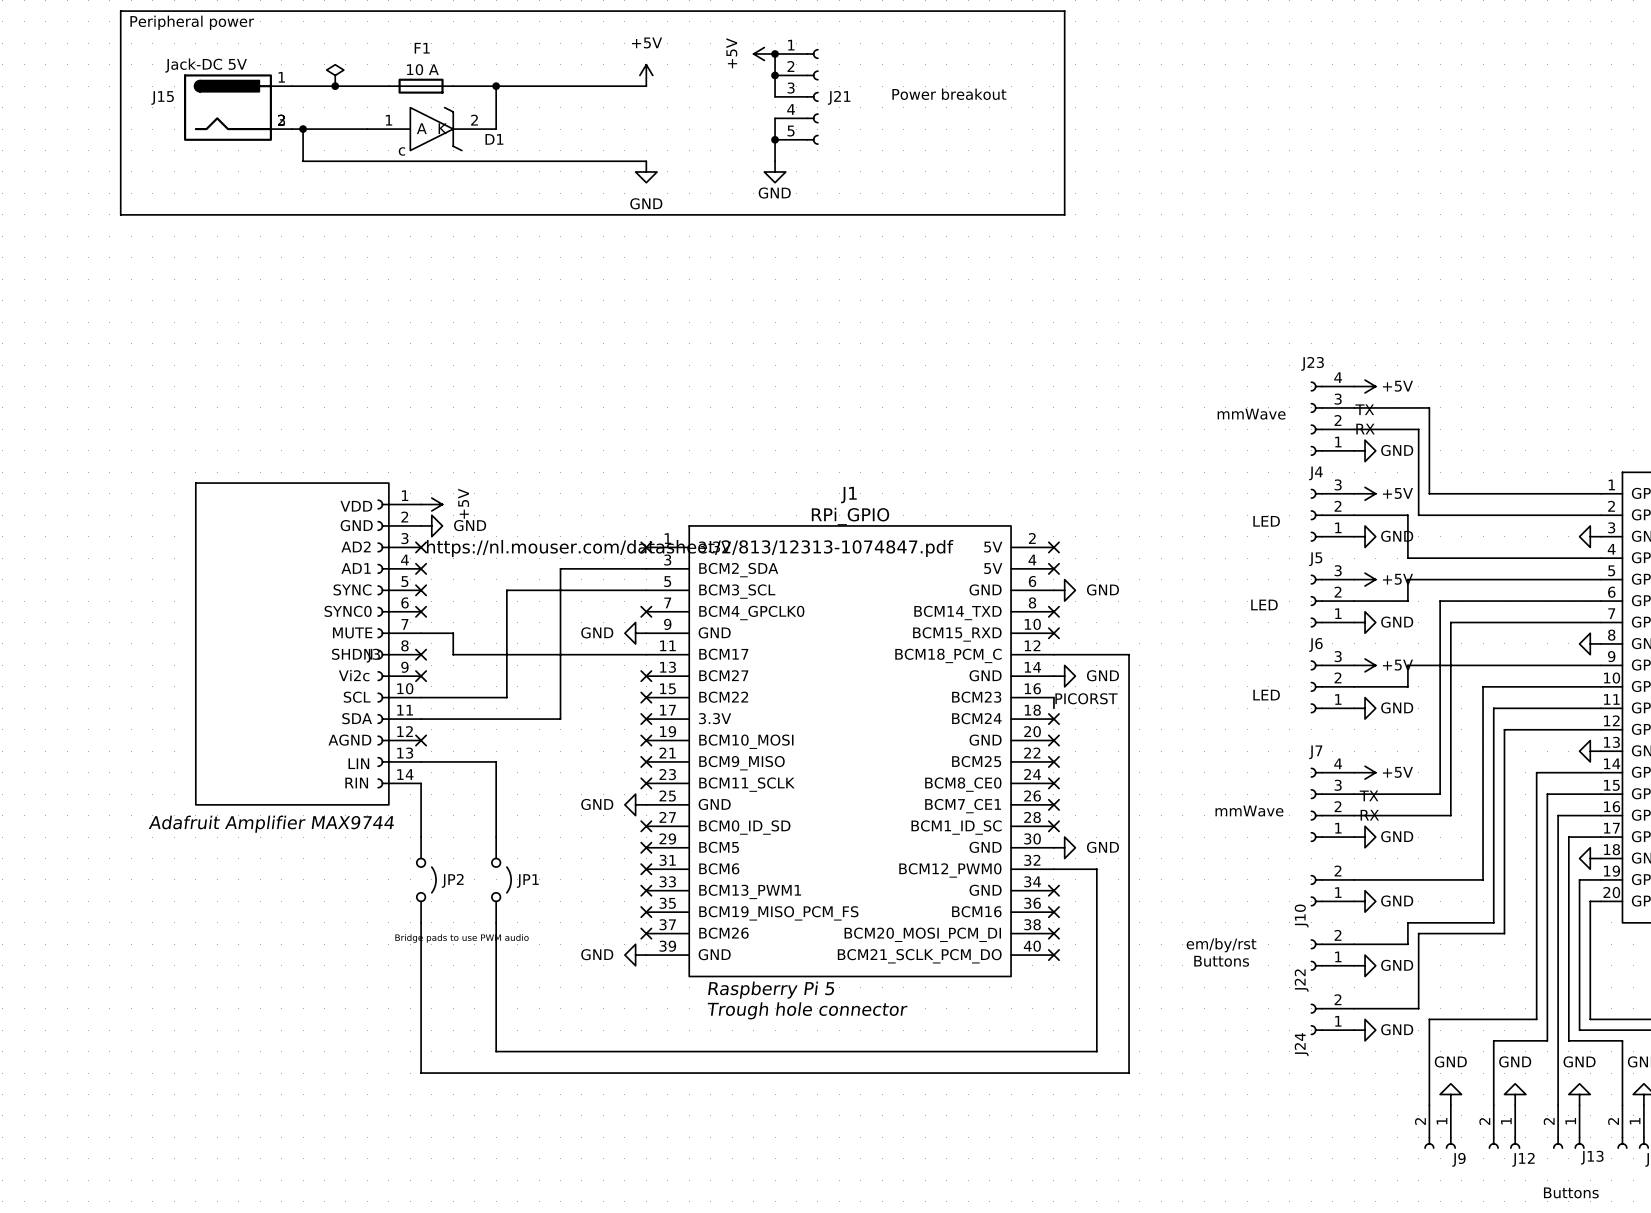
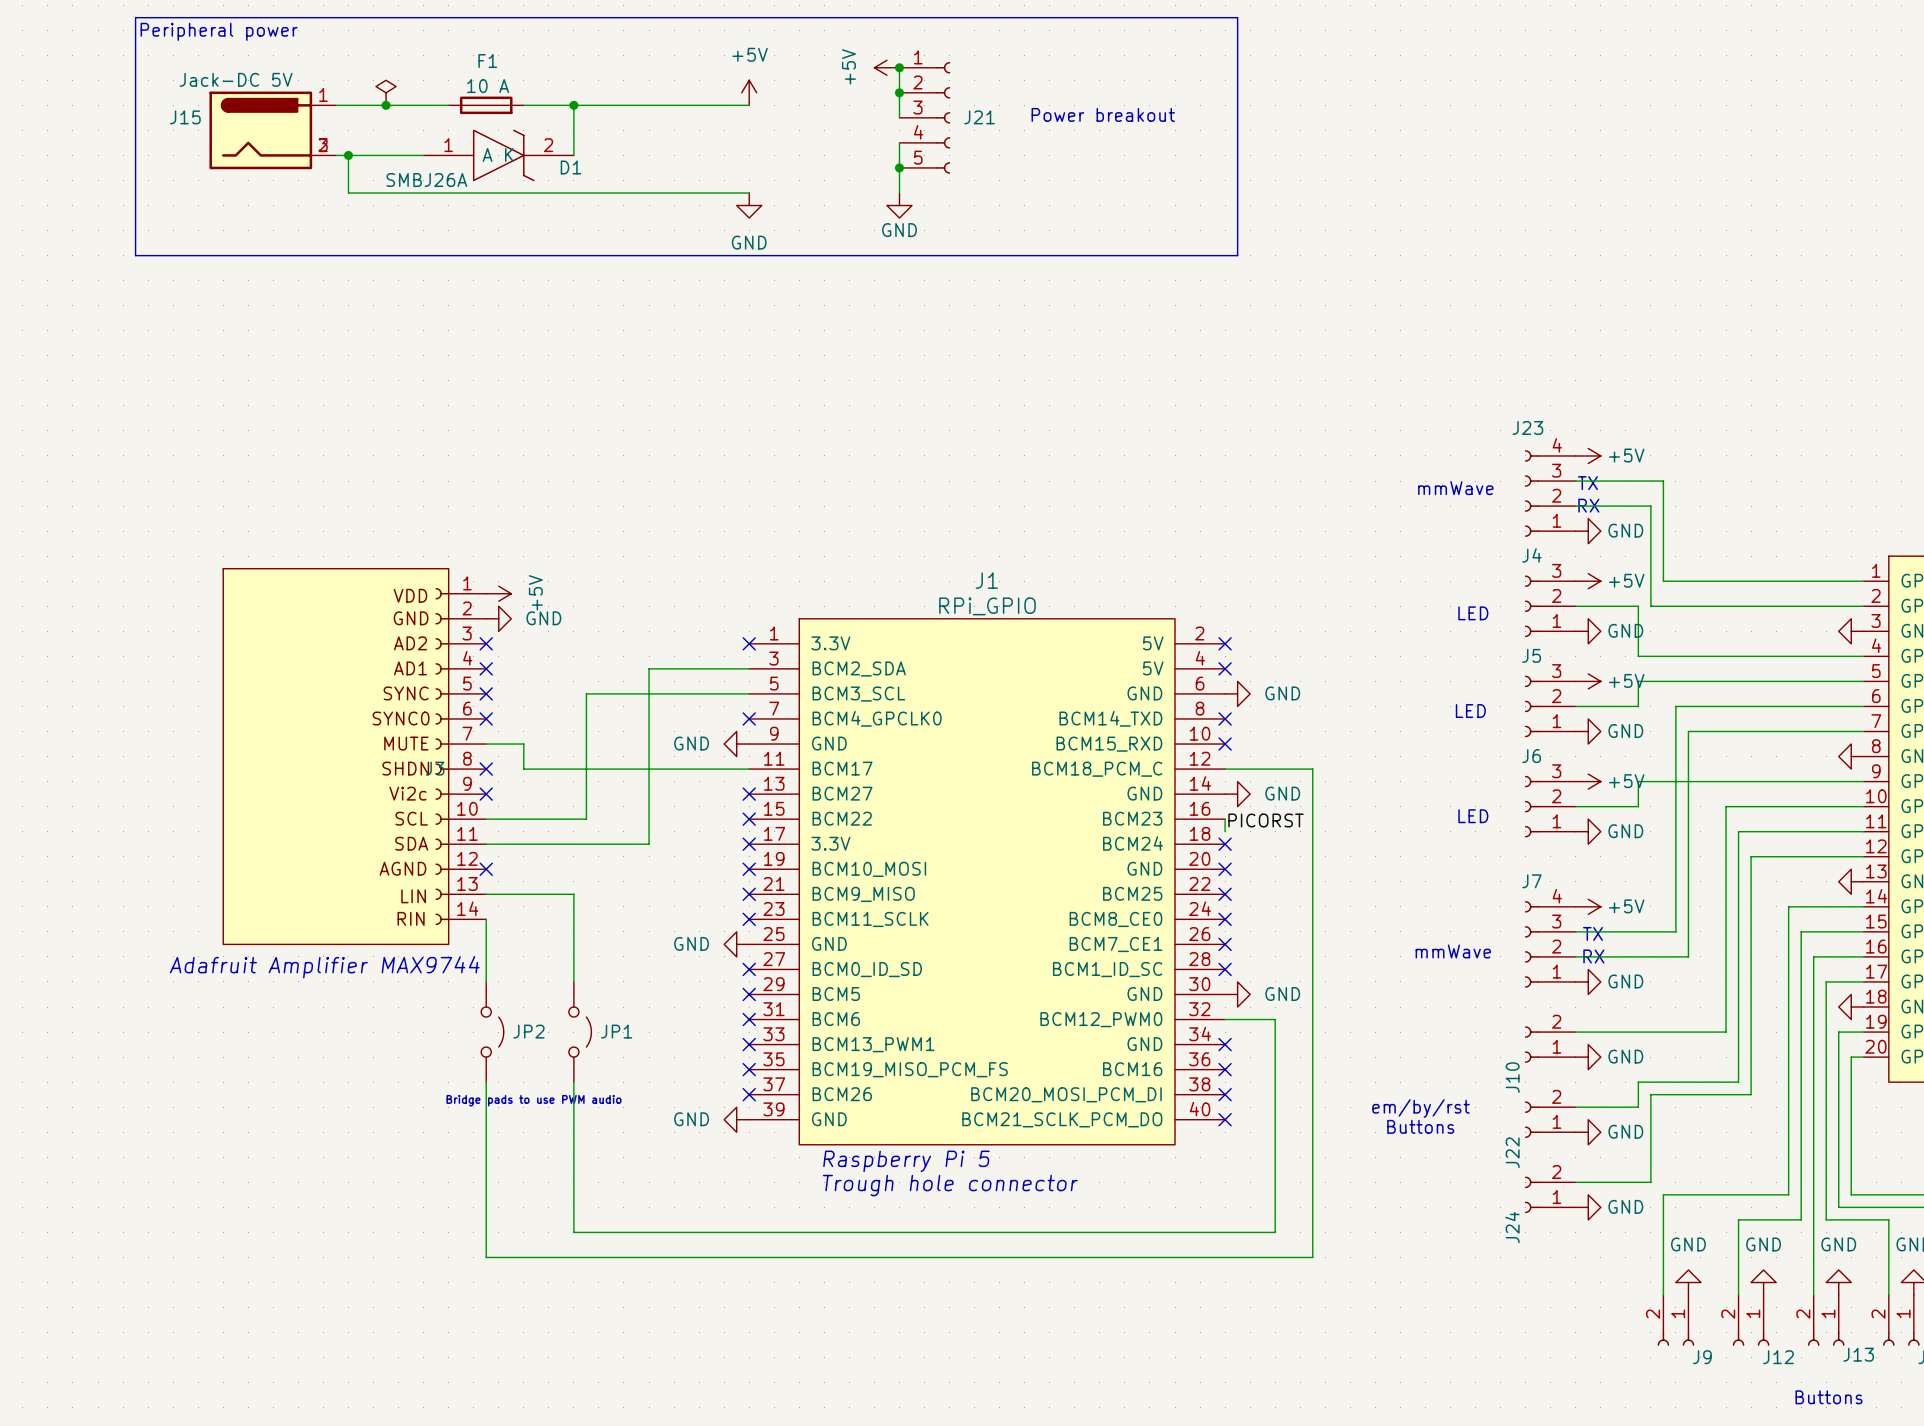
D1 value: c (401, 151) -> SMBJ26A (426, 180)
J1 text: https://nl.mouser.com/datasheet/2/813/12313-1074847.pdf (690, 548) -> none

